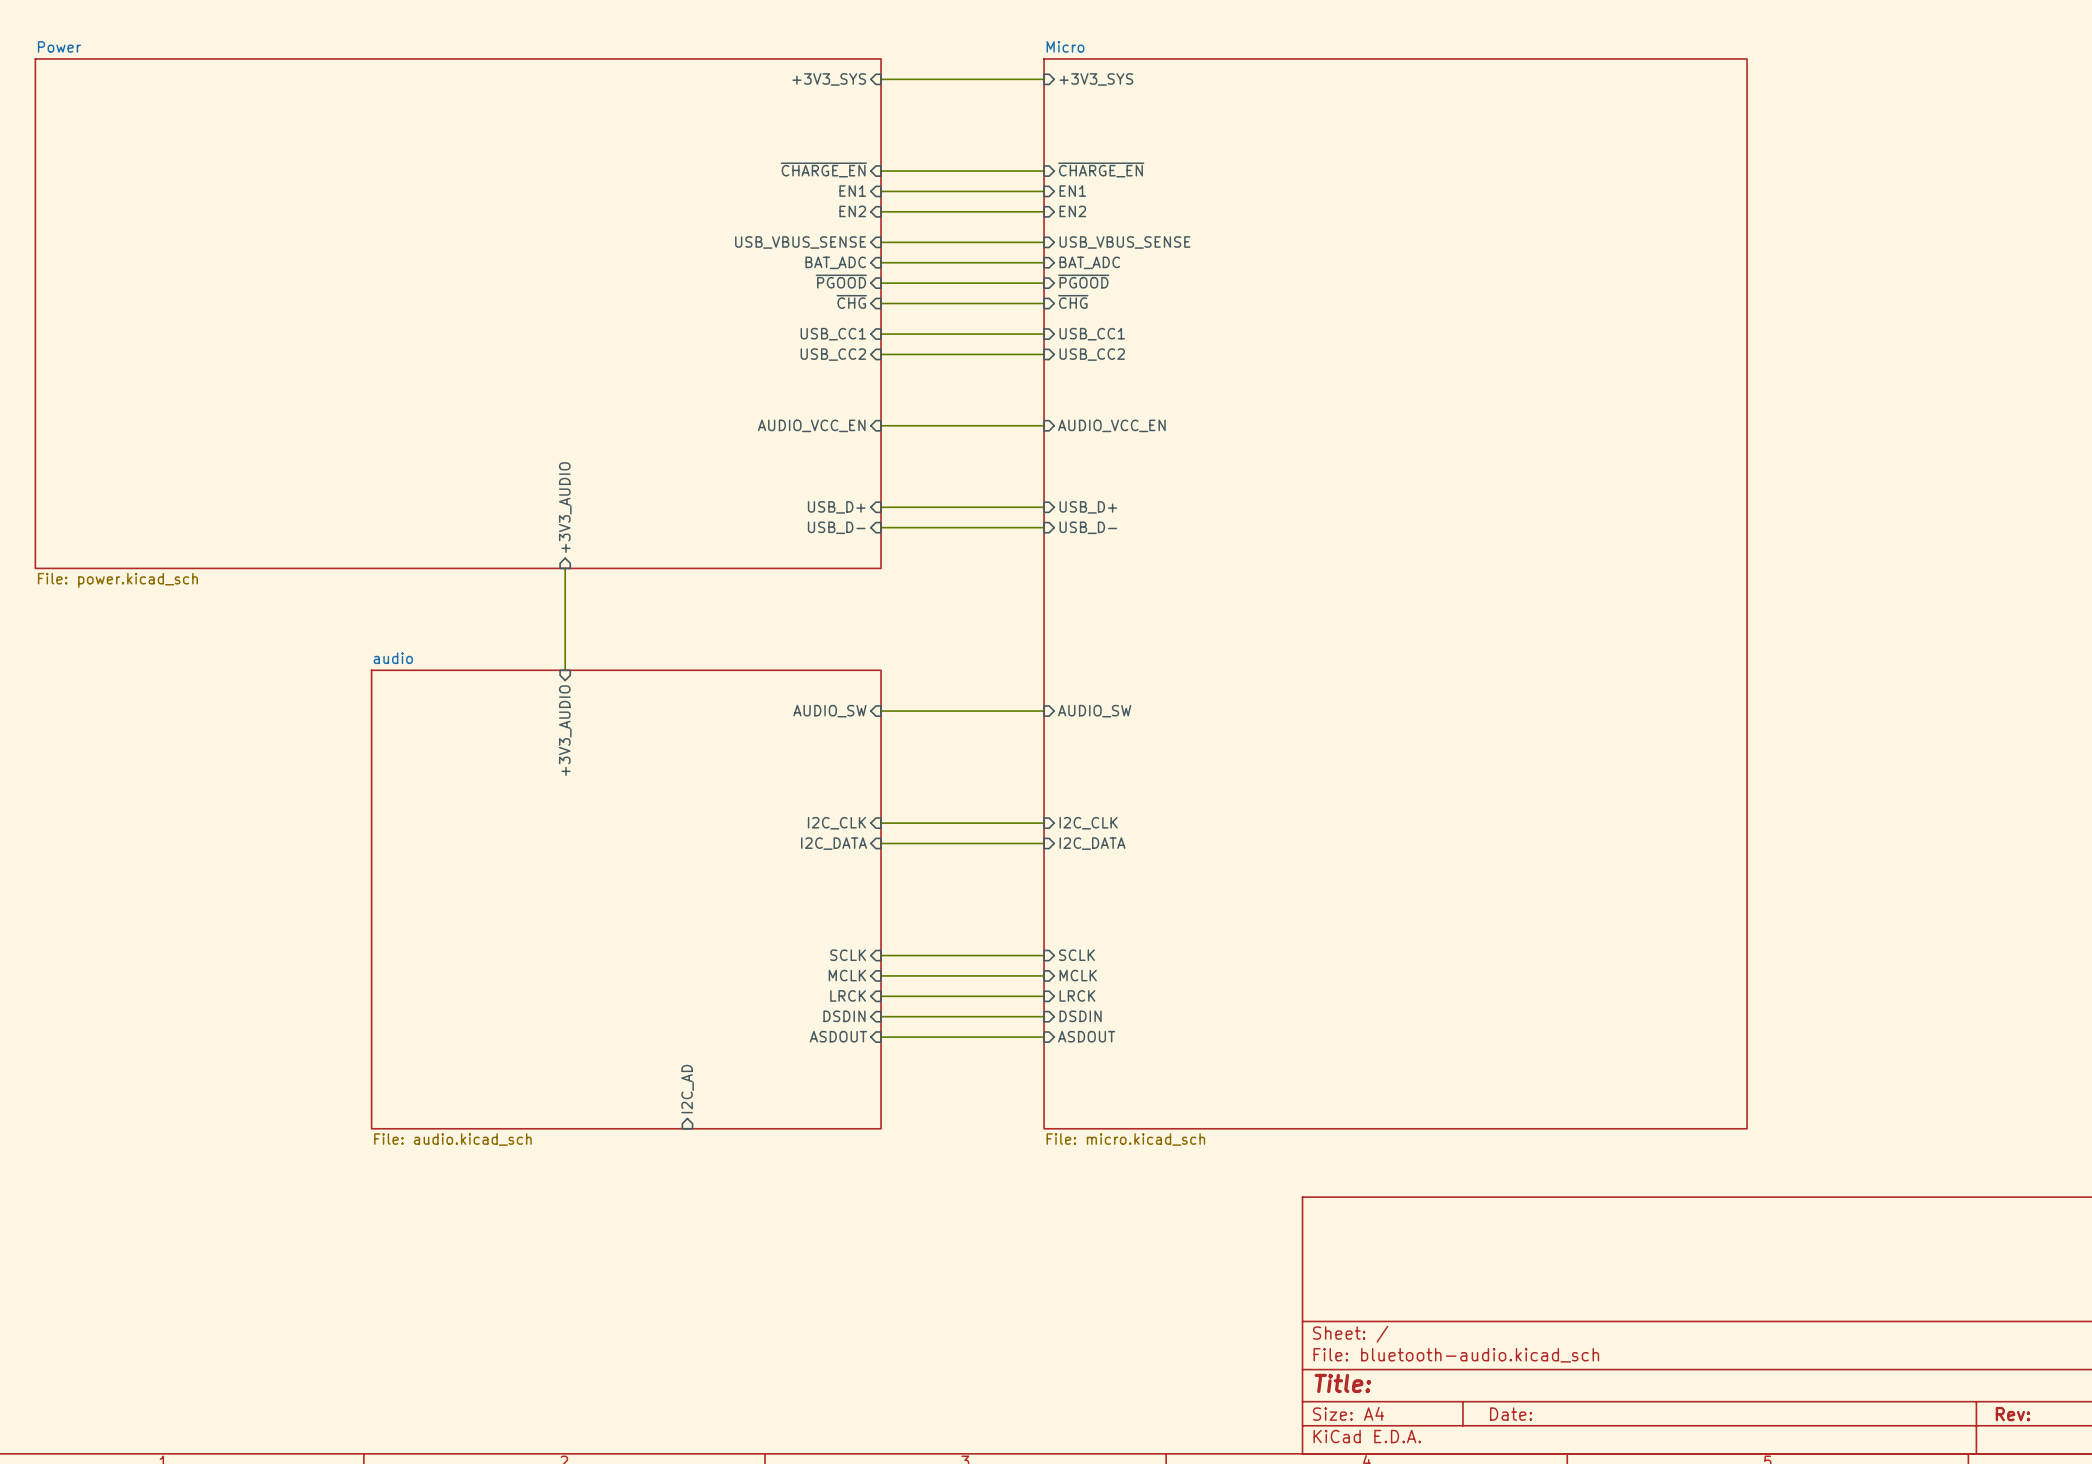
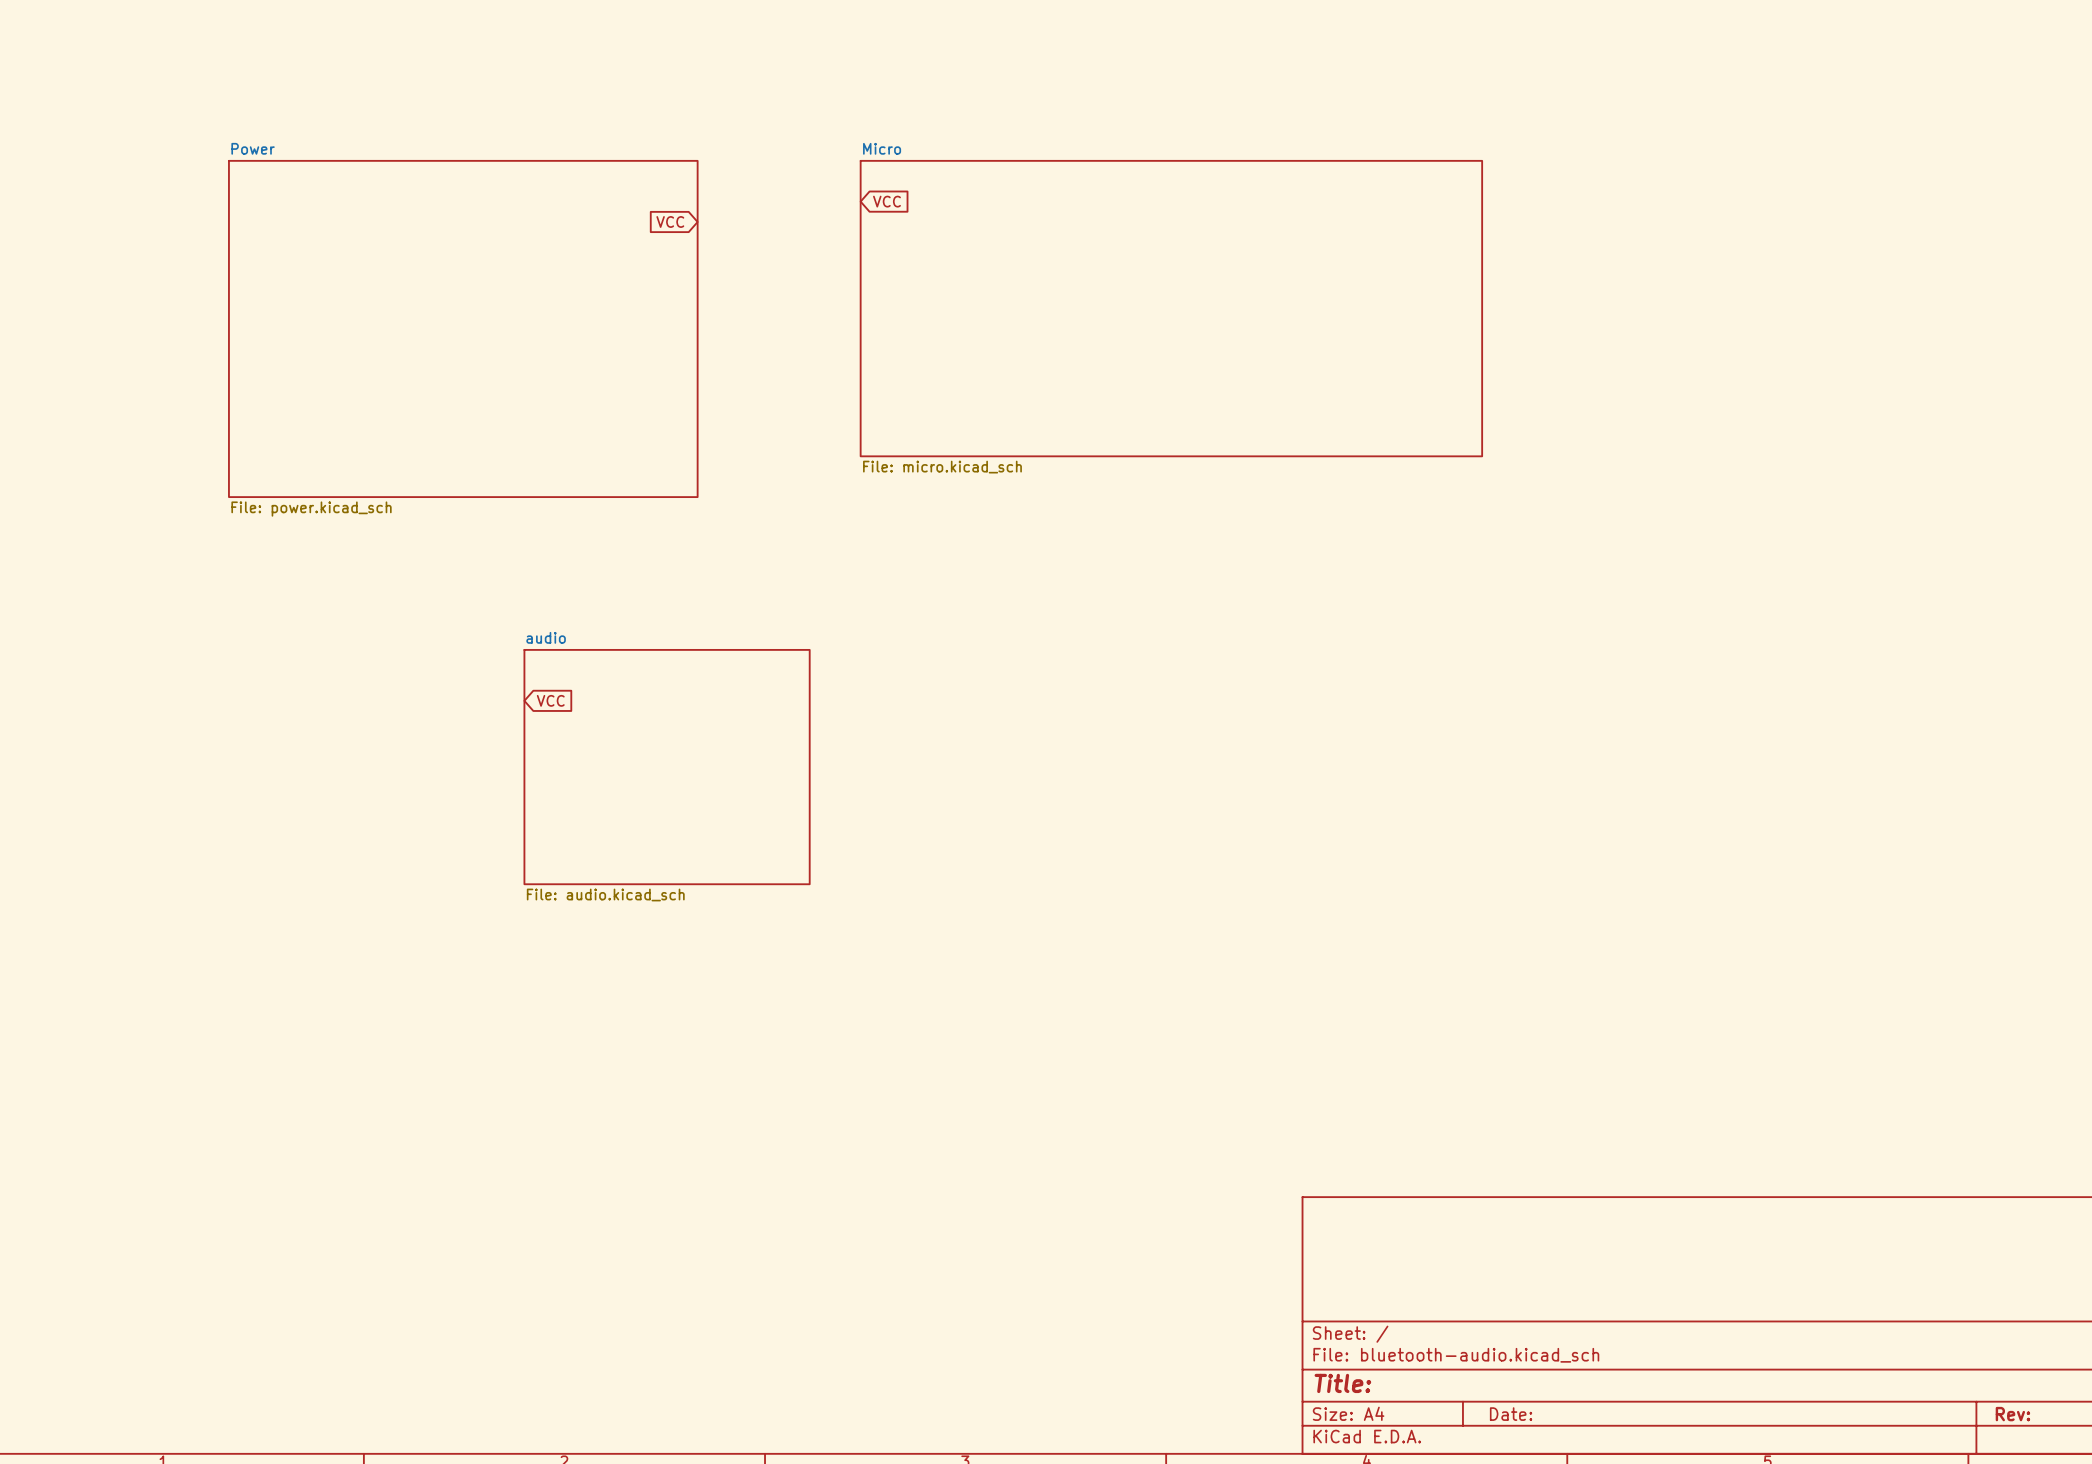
sheet pin: +3V3_SYS (829, 79) -> none
wire: (881, 79) (1044, 79) -> none
sheet pin: +3V3_SYS (1096, 79) -> none
sheet pin: ~{CHARGE_EN} (823, 169) -> none
sheet pin: ~{CHARGE_EN} (1101, 169) -> none
wire: (881, 171) (1044, 171) -> none
sheet pin: EN1 (852, 191) -> none
wire: (881, 191) (1044, 191) -> none
sheet pin: EN1 (1072, 191) -> none
global label: none -> VCC (886, 201)
sheet pin: EN2 (852, 211) -> none
wire: (881, 211) (1044, 211) -> none
sheet pin: EN2 (1072, 211) -> none
global label: none -> VCC (670, 221)
sheet pin: USB_VBUS_SENSE (800, 242) -> none
wire: (881, 242) (1044, 242) -> none
sheet pin: USB_VBUS_SENSE (1124, 242) -> none
sheet pin: BAT_ADC (835, 262) -> none
wire: (881, 262) (1044, 262) -> none
sheet pin: BAT_ADC (1089, 262) -> none
sheet pin: ~{PGOOD} (841, 281) -> none
sheet pin: ~{PGOOD} (1083, 281) -> none
wire: (881, 283) (1044, 283) -> none
sheet pin: ~{CHG} (851, 301) -> none
sheet pin: ~{CHG} (1073, 301) -> none
wire: (881, 303) (1044, 303) -> none
sheet Micro: none -> File: micro.kicad_sch (1171, 308)
sheet Power: File: power.kicad_sch (458, 313) -> none
sheet Power: none -> File: power.kicad_sch (463, 328)
sheet pin: USB_CC1 (833, 334) -> none
wire: (881, 334) (1044, 334) -> none
sheet pin: USB_CC1 (1092, 334) -> none
sheet pin: USB_CC2 (833, 354) -> none
wire: (881, 354) (1044, 354) -> none
sheet pin: USB_CC2 (1092, 354) -> none
sheet pin: AUDIO_VCC_EN (811, 425) -> none
wire: (881, 425) (1044, 425) -> none
sheet pin: AUDIO_VCC_EN (1111, 425) -> none
sheet pin: +3V3_AUDIO (565, 507) -> none
sheet pin: USB_D+ (836, 507) -> none
wire: (881, 507) (1044, 507) -> none
sheet pin: USB_D+ (1088, 507) -> none
sheet pin: USB_D- (836, 527) -> none
wire: (881, 527) (1044, 527) -> none
sheet pin: USB_D- (1088, 527) -> none
wire: (565, 568) (565, 670) -> none
sheet Micro: File: micro.kicad_sch (1395, 593) -> none
global label: none -> VCC (550, 700)
sheet pin: AUDIO_SW (829, 711) -> none
wire: (881, 711) (1044, 711) -> none
sheet pin: AUDIO_SW (1094, 711) -> none
sheet pin: +3V3_AUDIO (565, 730) -> none
sheet audio: none -> File: audio.kicad_sch (667, 767)
sheet pin: I2C_CLK (836, 823) -> none
wire: (881, 823) (1044, 823) -> none
sheet pin: I2C_CLK (1088, 823) -> none
sheet pin: I2C_DATA (834, 843) -> none
wire: (881, 843) (1044, 843) -> none
sheet pin: I2C_DATA (1092, 843) -> none
sheet audio: File: audio.kicad_sch (626, 899) -> none
sheet pin: SCLK (848, 955) -> none
wire: (881, 955) (1044, 955) -> none
sheet pin: SCLK (1076, 955) -> none
sheet pin: MCLK (847, 975) -> none
wire: (881, 975) (1044, 975) -> none
sheet pin: MCLK (1078, 975) -> none
sheet pin: LRCK (848, 995) -> none
sheet pin: LRCK (1077, 995) -> none
wire: (881, 996) (1044, 996) -> none
sheet pin: DSDIN (844, 1016) -> none
wire: (881, 1016) (1044, 1016) -> none
sheet pin: DSDIN (1080, 1016) -> none
sheet pin: ASDOUT (838, 1036) -> none
sheet pin: ASDOUT (1086, 1036) -> none
wire: (881, 1037) (1044, 1037) -> none
sheet pin: I2C_AD (687, 1089) -> none

